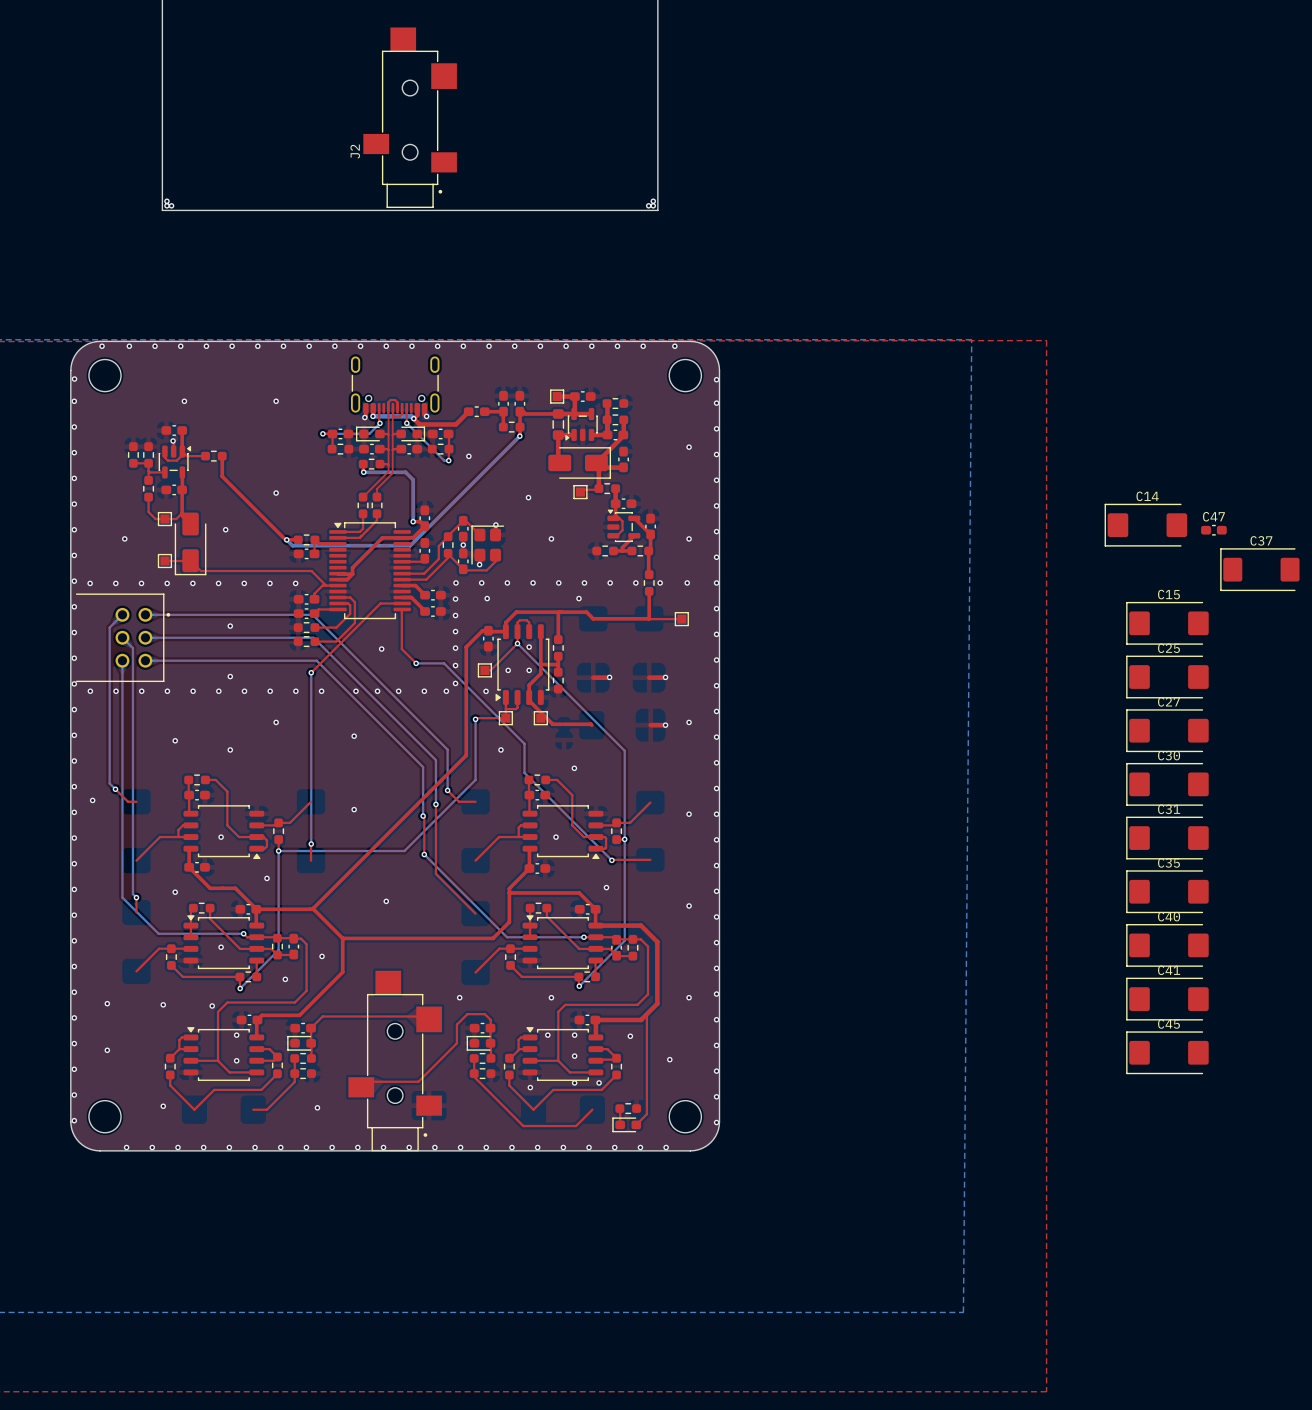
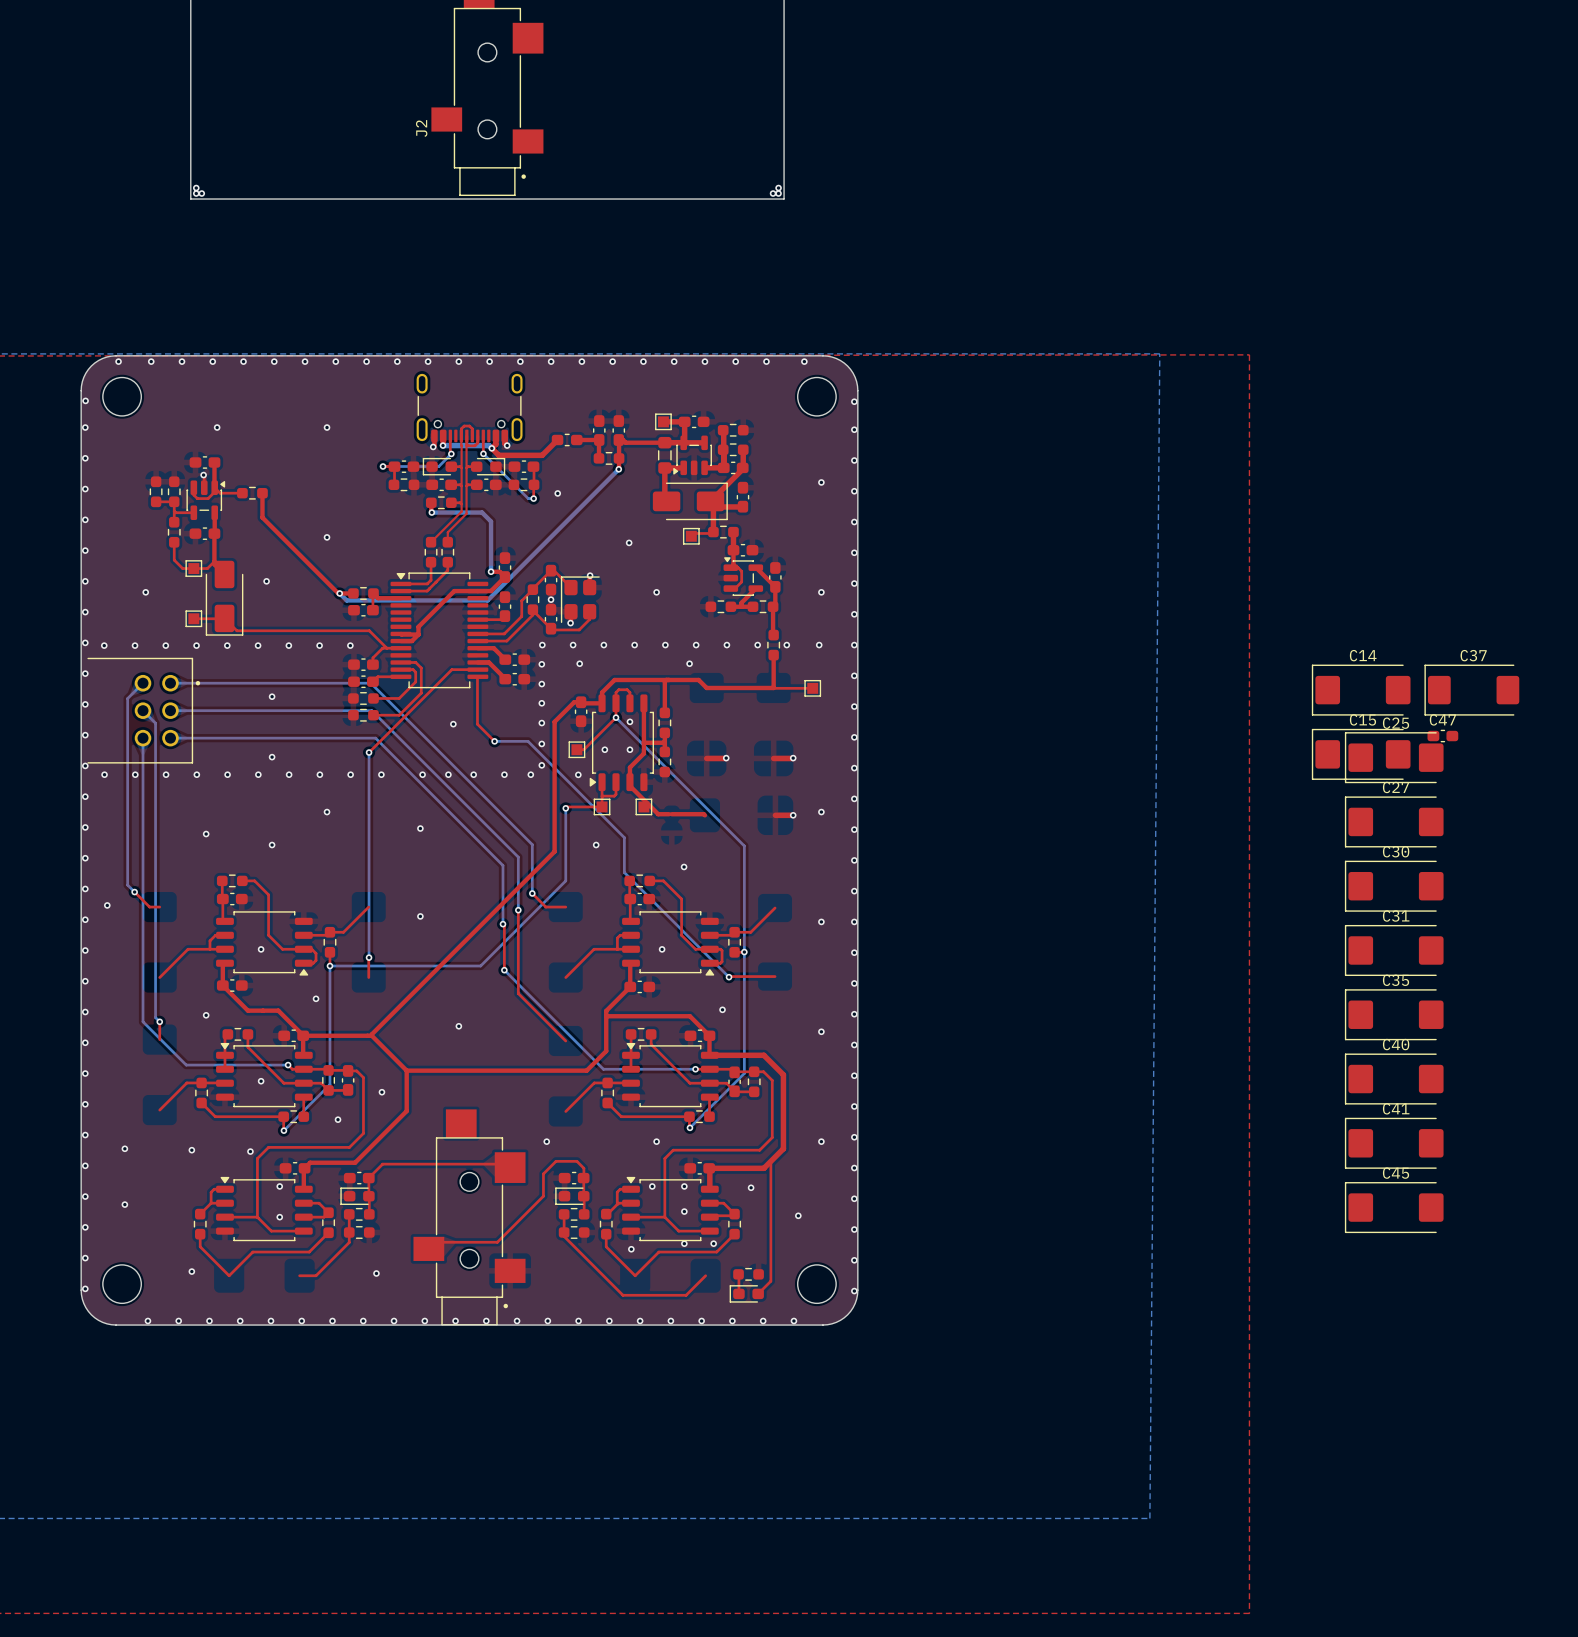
C14 position: (1145, 525) -> (1361, 690)
C47 position: (1213, 530) -> (1442, 736)
C37 position: (1259, 569) -> (1471, 690)
C15 position: (1167, 623) -> (1361, 754)

